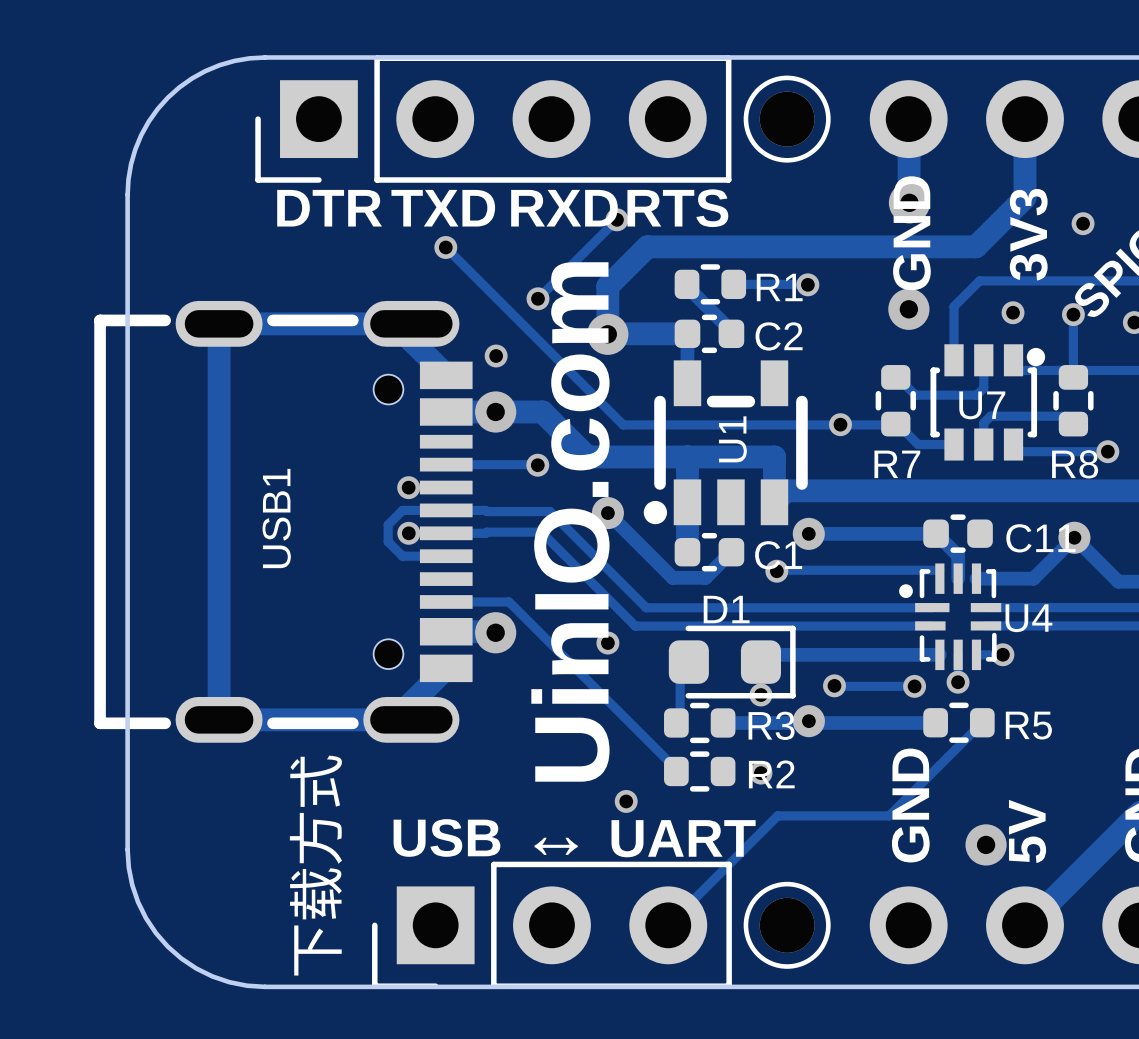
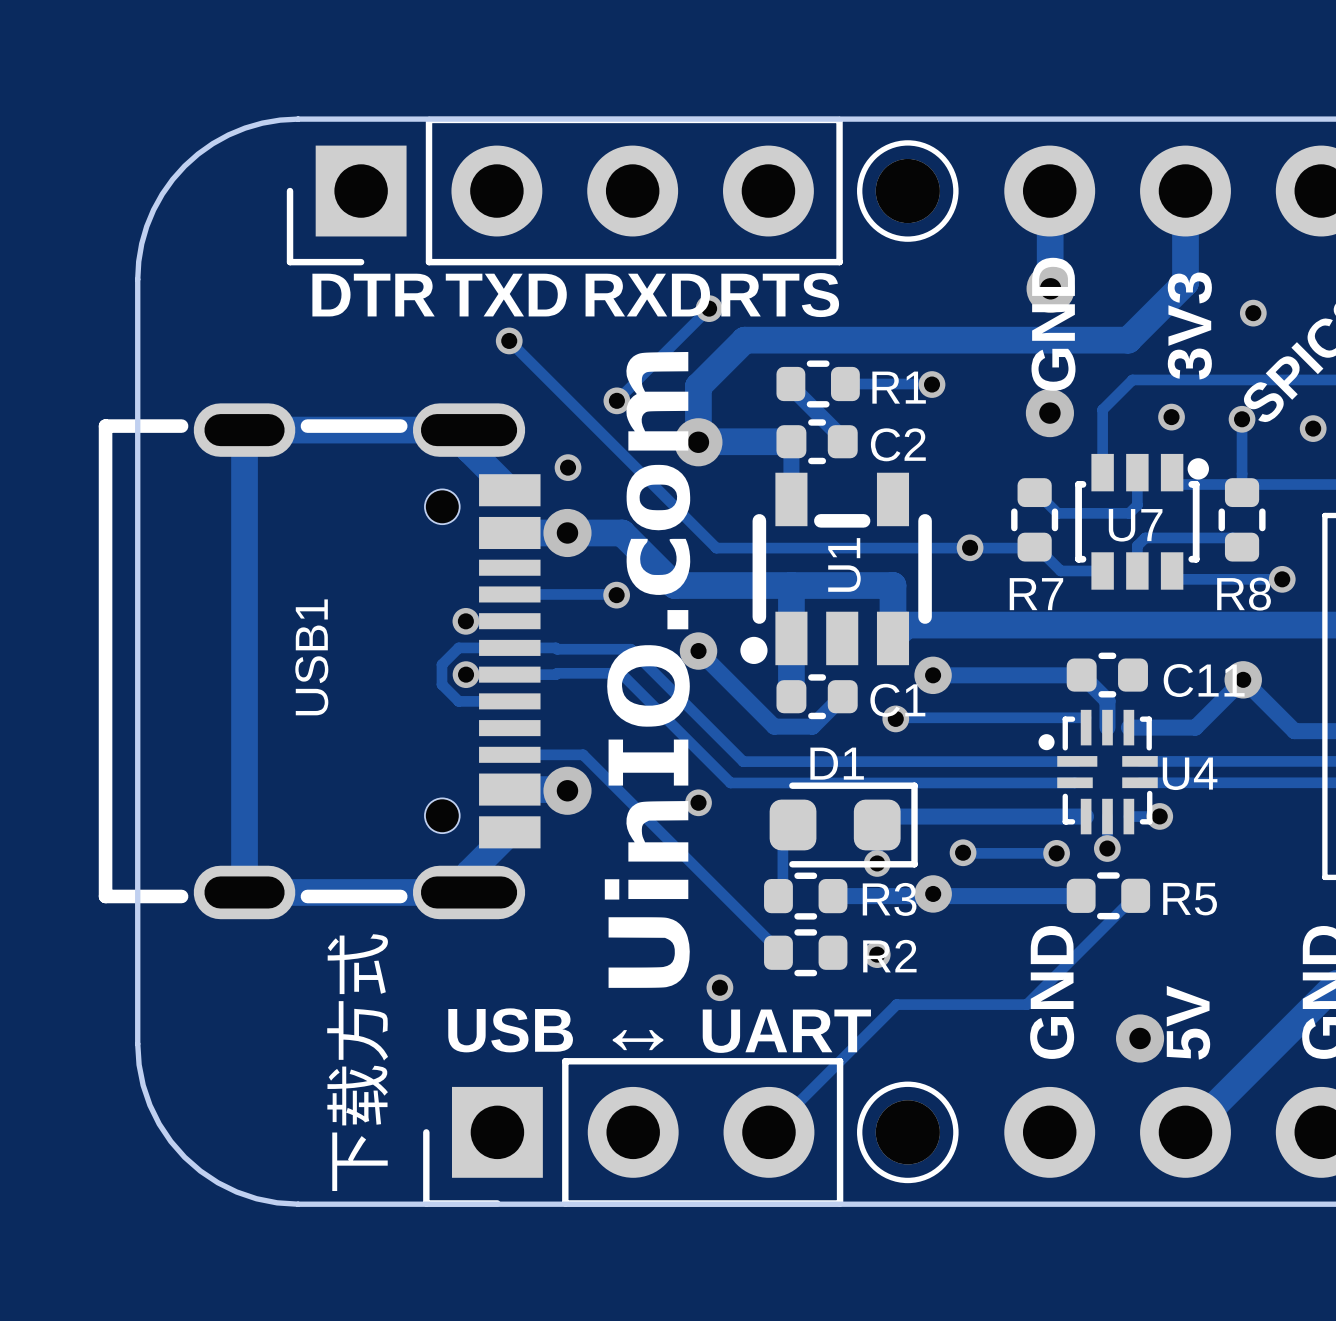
drawing: none -> [604, 351, 691, 988]
text: UinIO.com (570, 521) -> none

